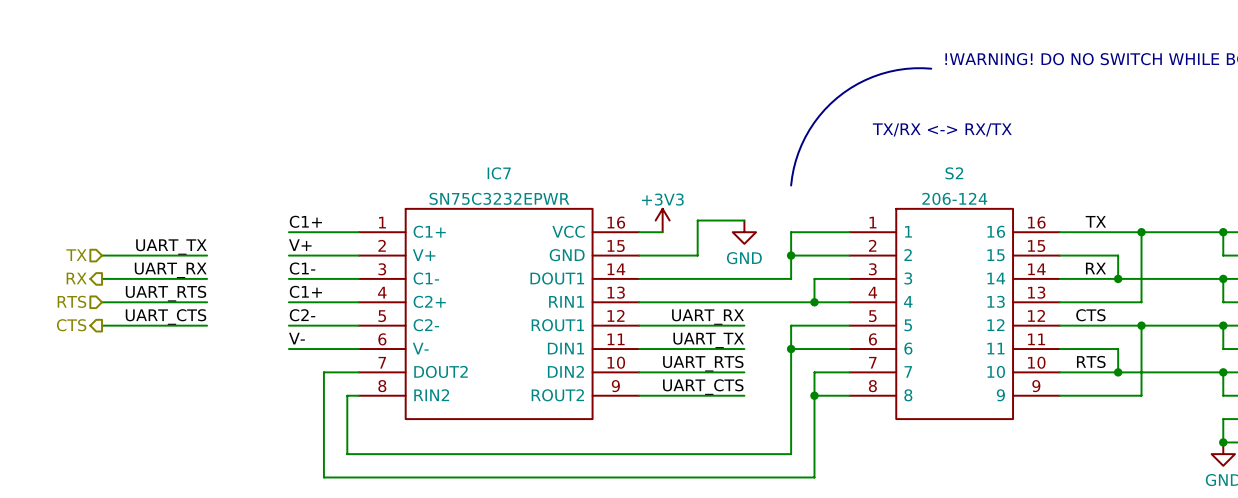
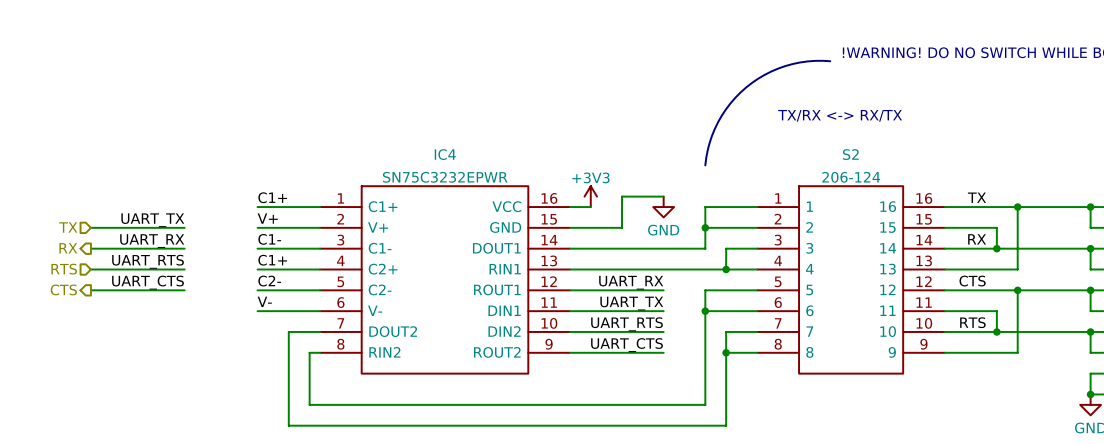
IC7 name: IC7 (499, 173) -> IC4 (445, 154)

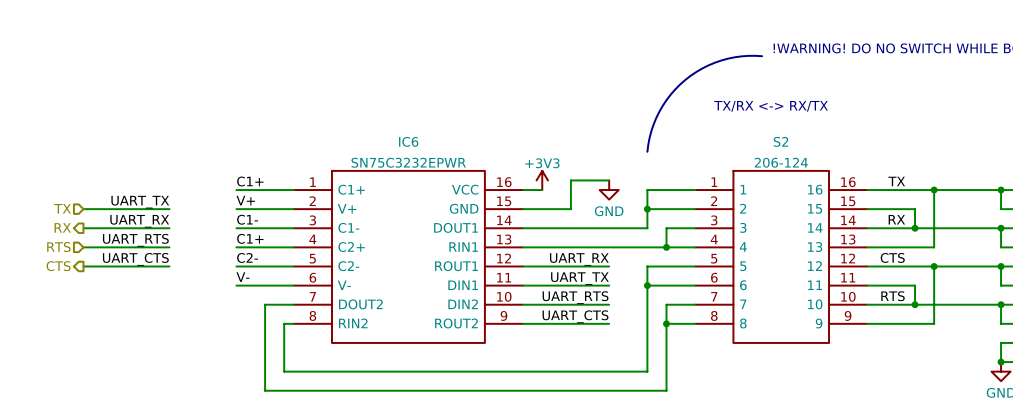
IC4 name: IC4 (445, 154) -> IC6 (408, 141)

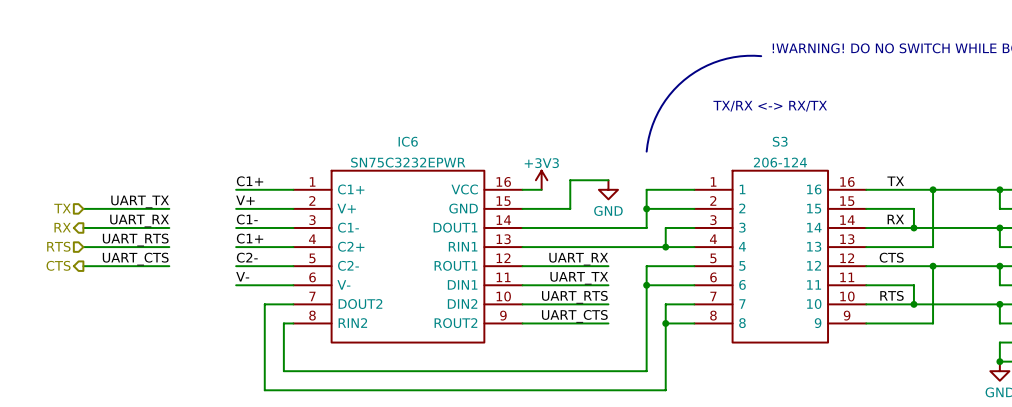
S2 name: S2 (780, 141) -> S3 (780, 141)

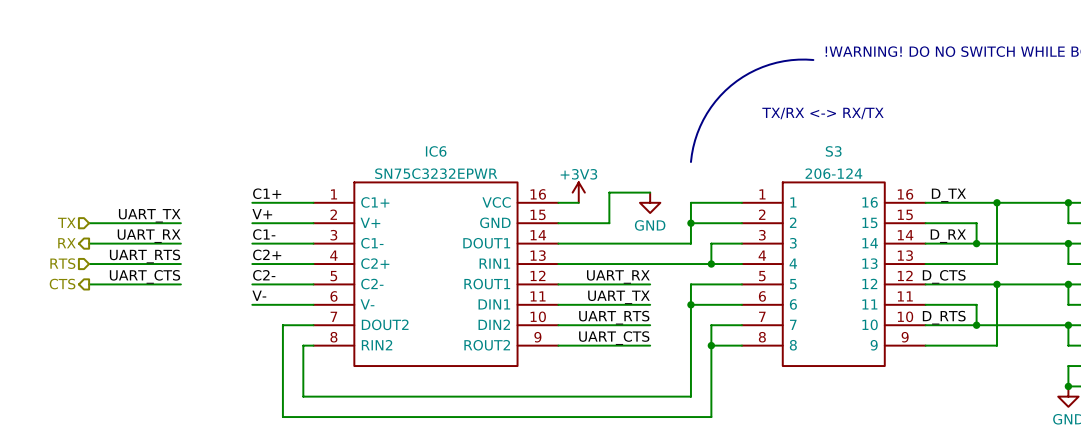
label: TX (895, 181) -> D_TX (948, 195)
label: RX (895, 219) -> D_RX (948, 236)
label: C1+ (250, 238) -> C2+ (267, 254)
label: CTS (891, 257) -> D_CTS (944, 276)
label: RTS (891, 295) -> D_RTS (944, 317)

